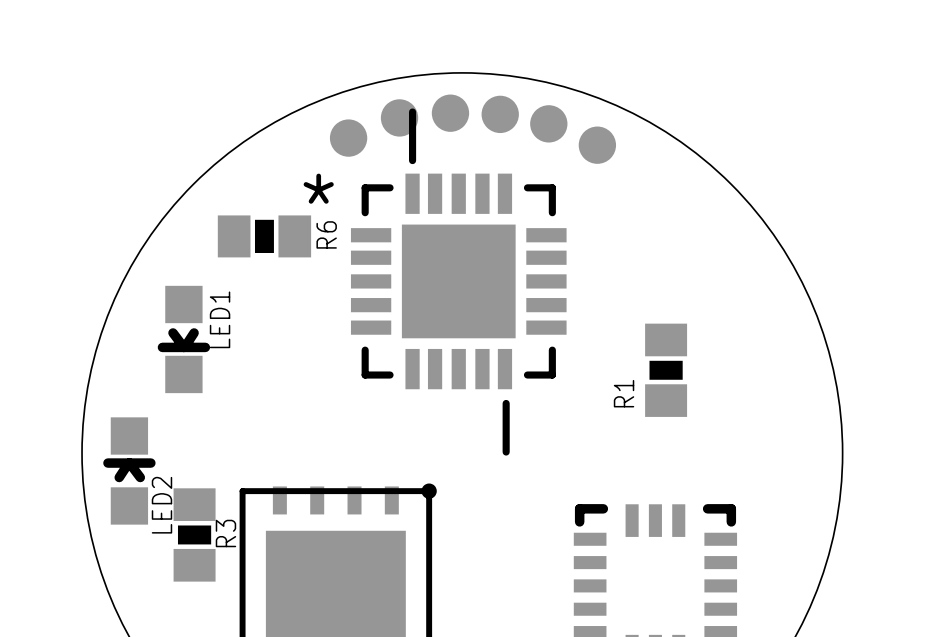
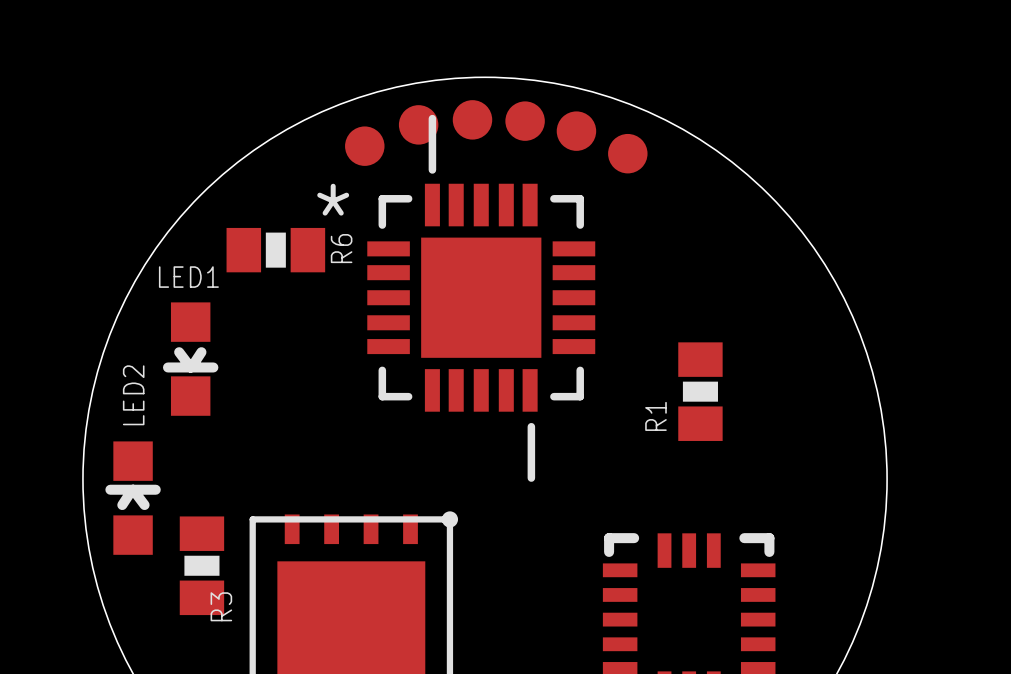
LED1 name rotation: 0° (220, 319) -> 90° clockwise (188, 277)
LED2 name position: LED2 (161, 505) -> LED2 (133, 395)
R3 name position: R3 (225, 533) -> R3 (221, 606)

